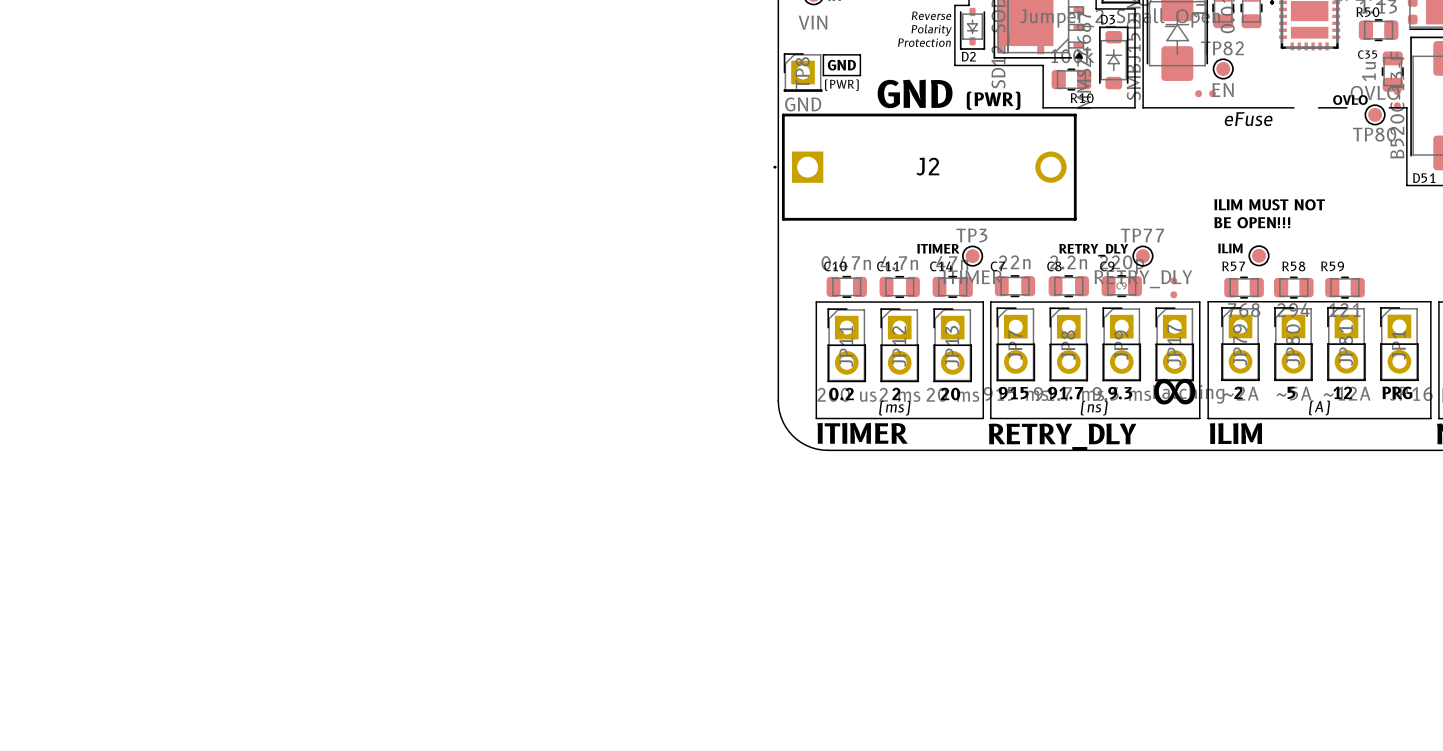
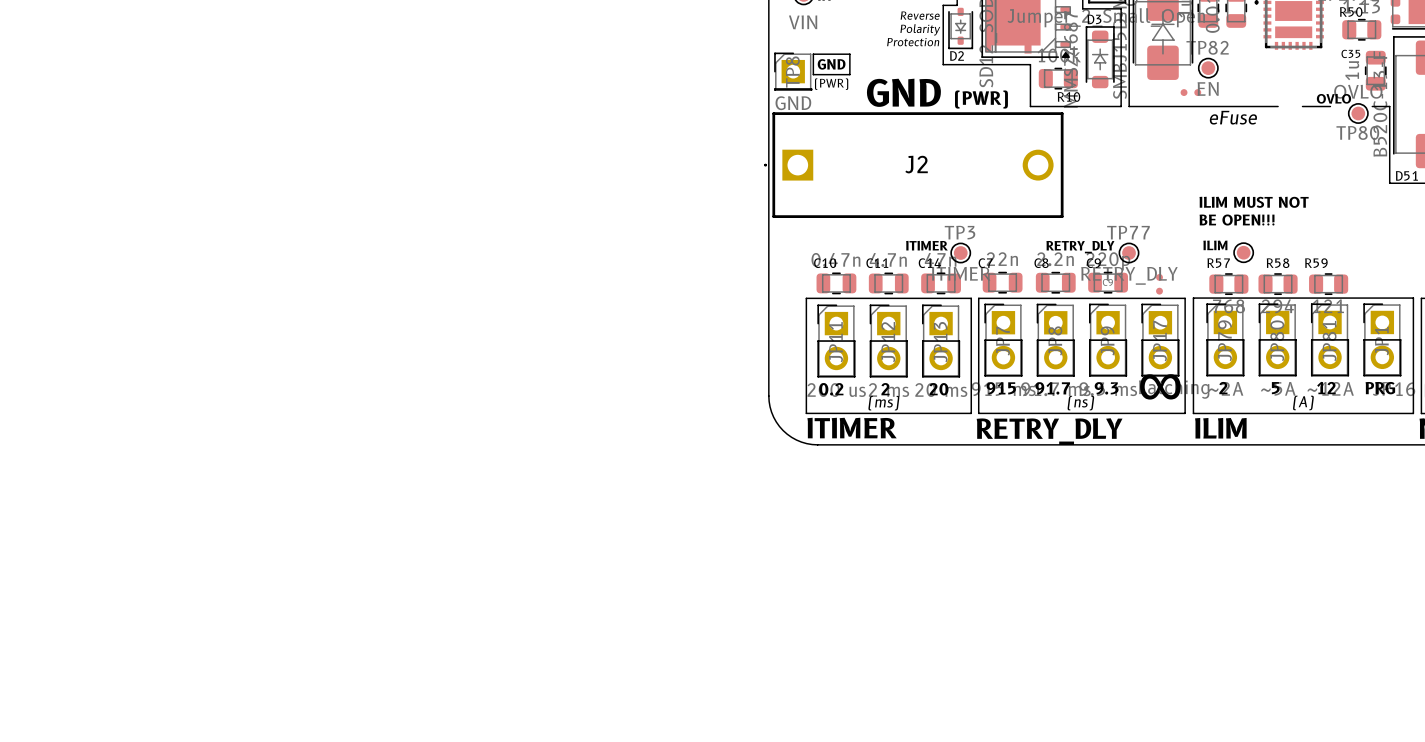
part: (1397, 98) -> none

